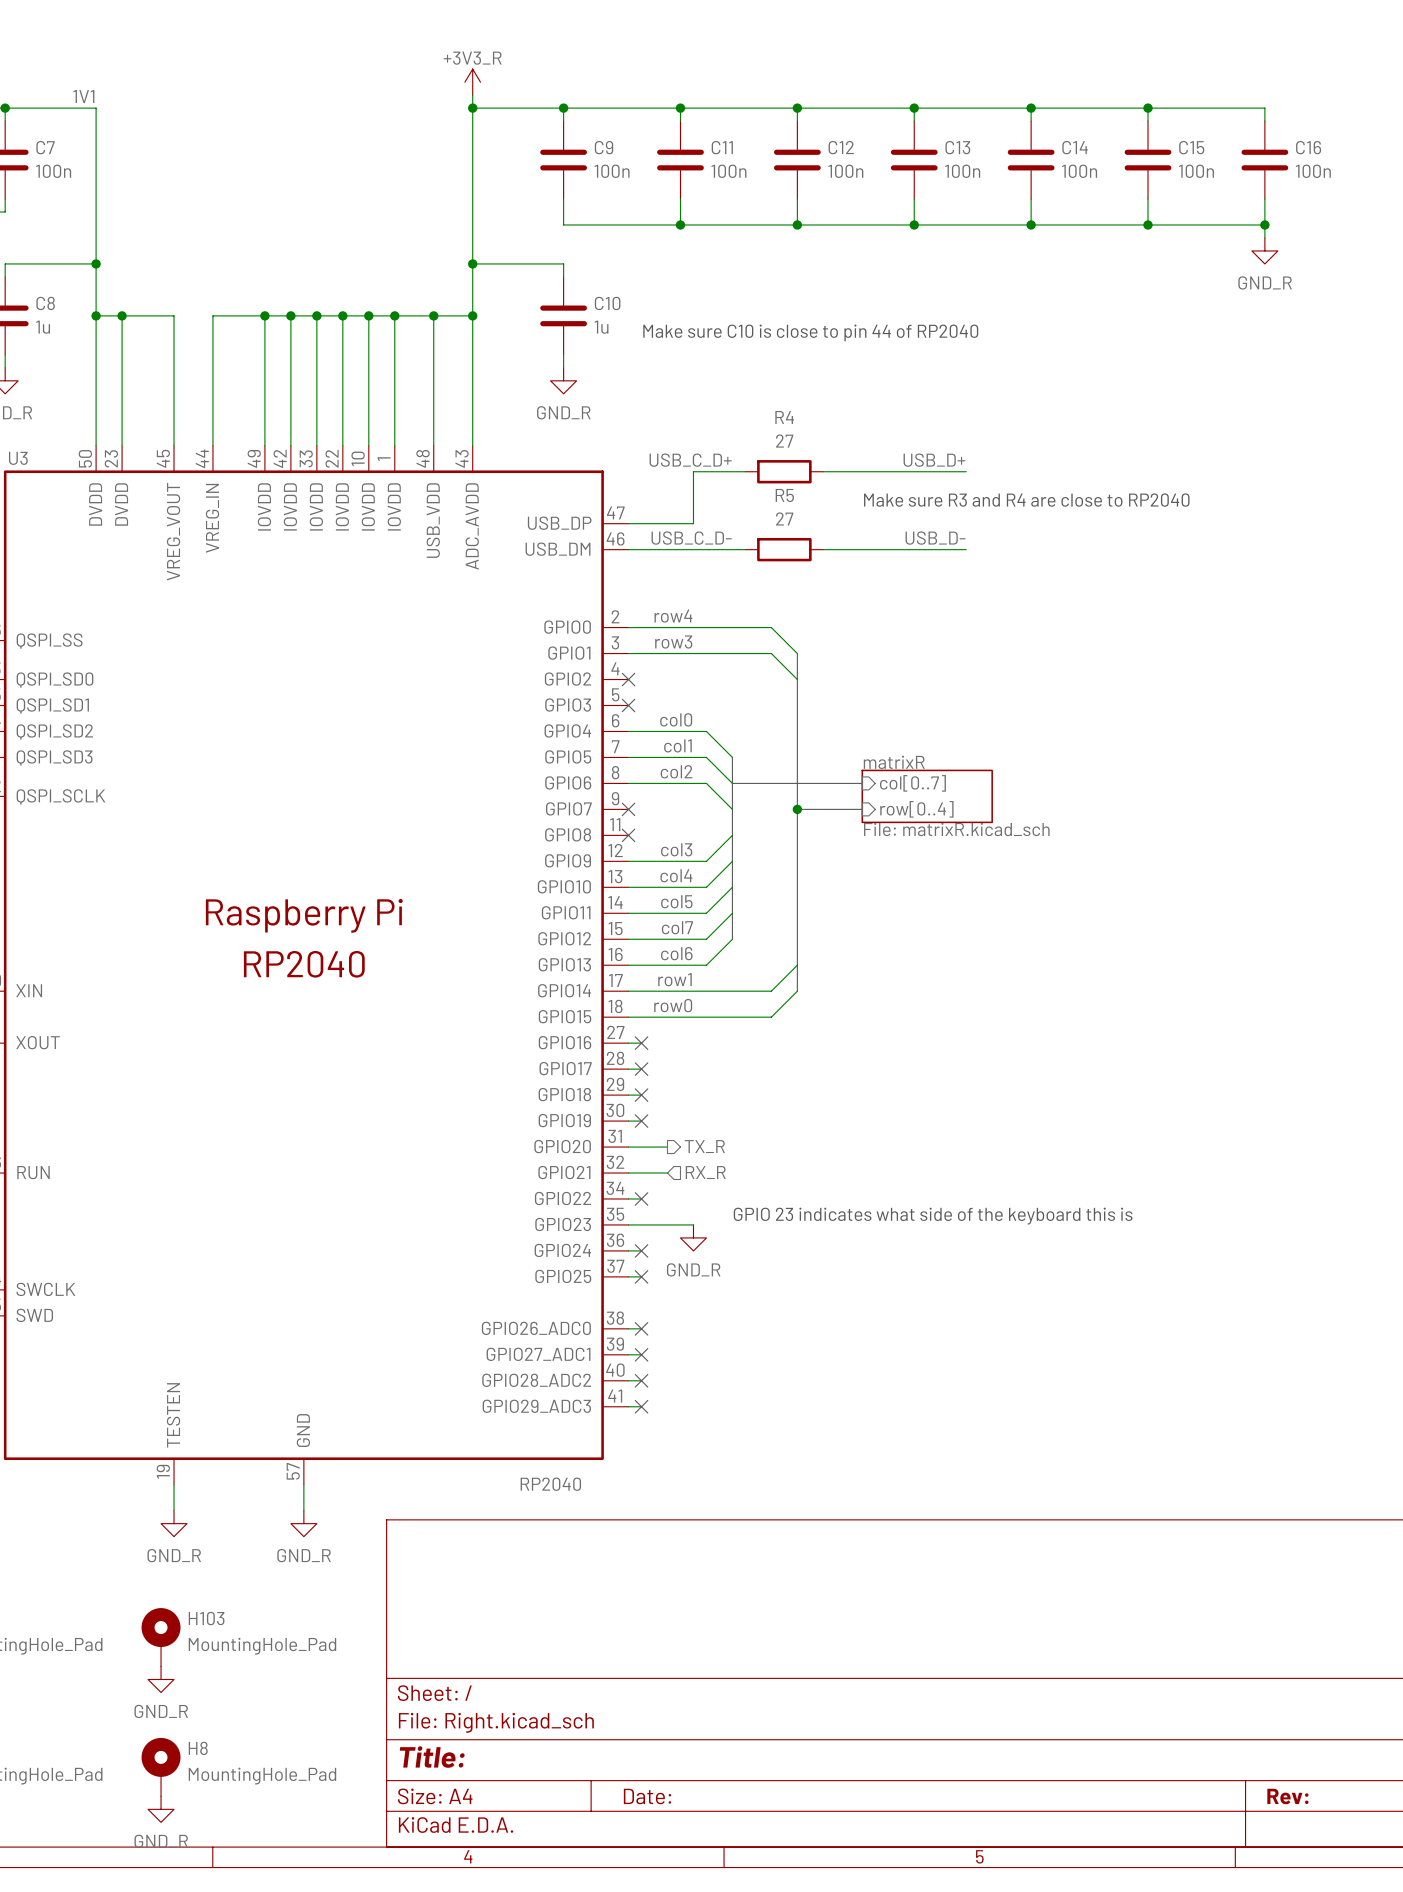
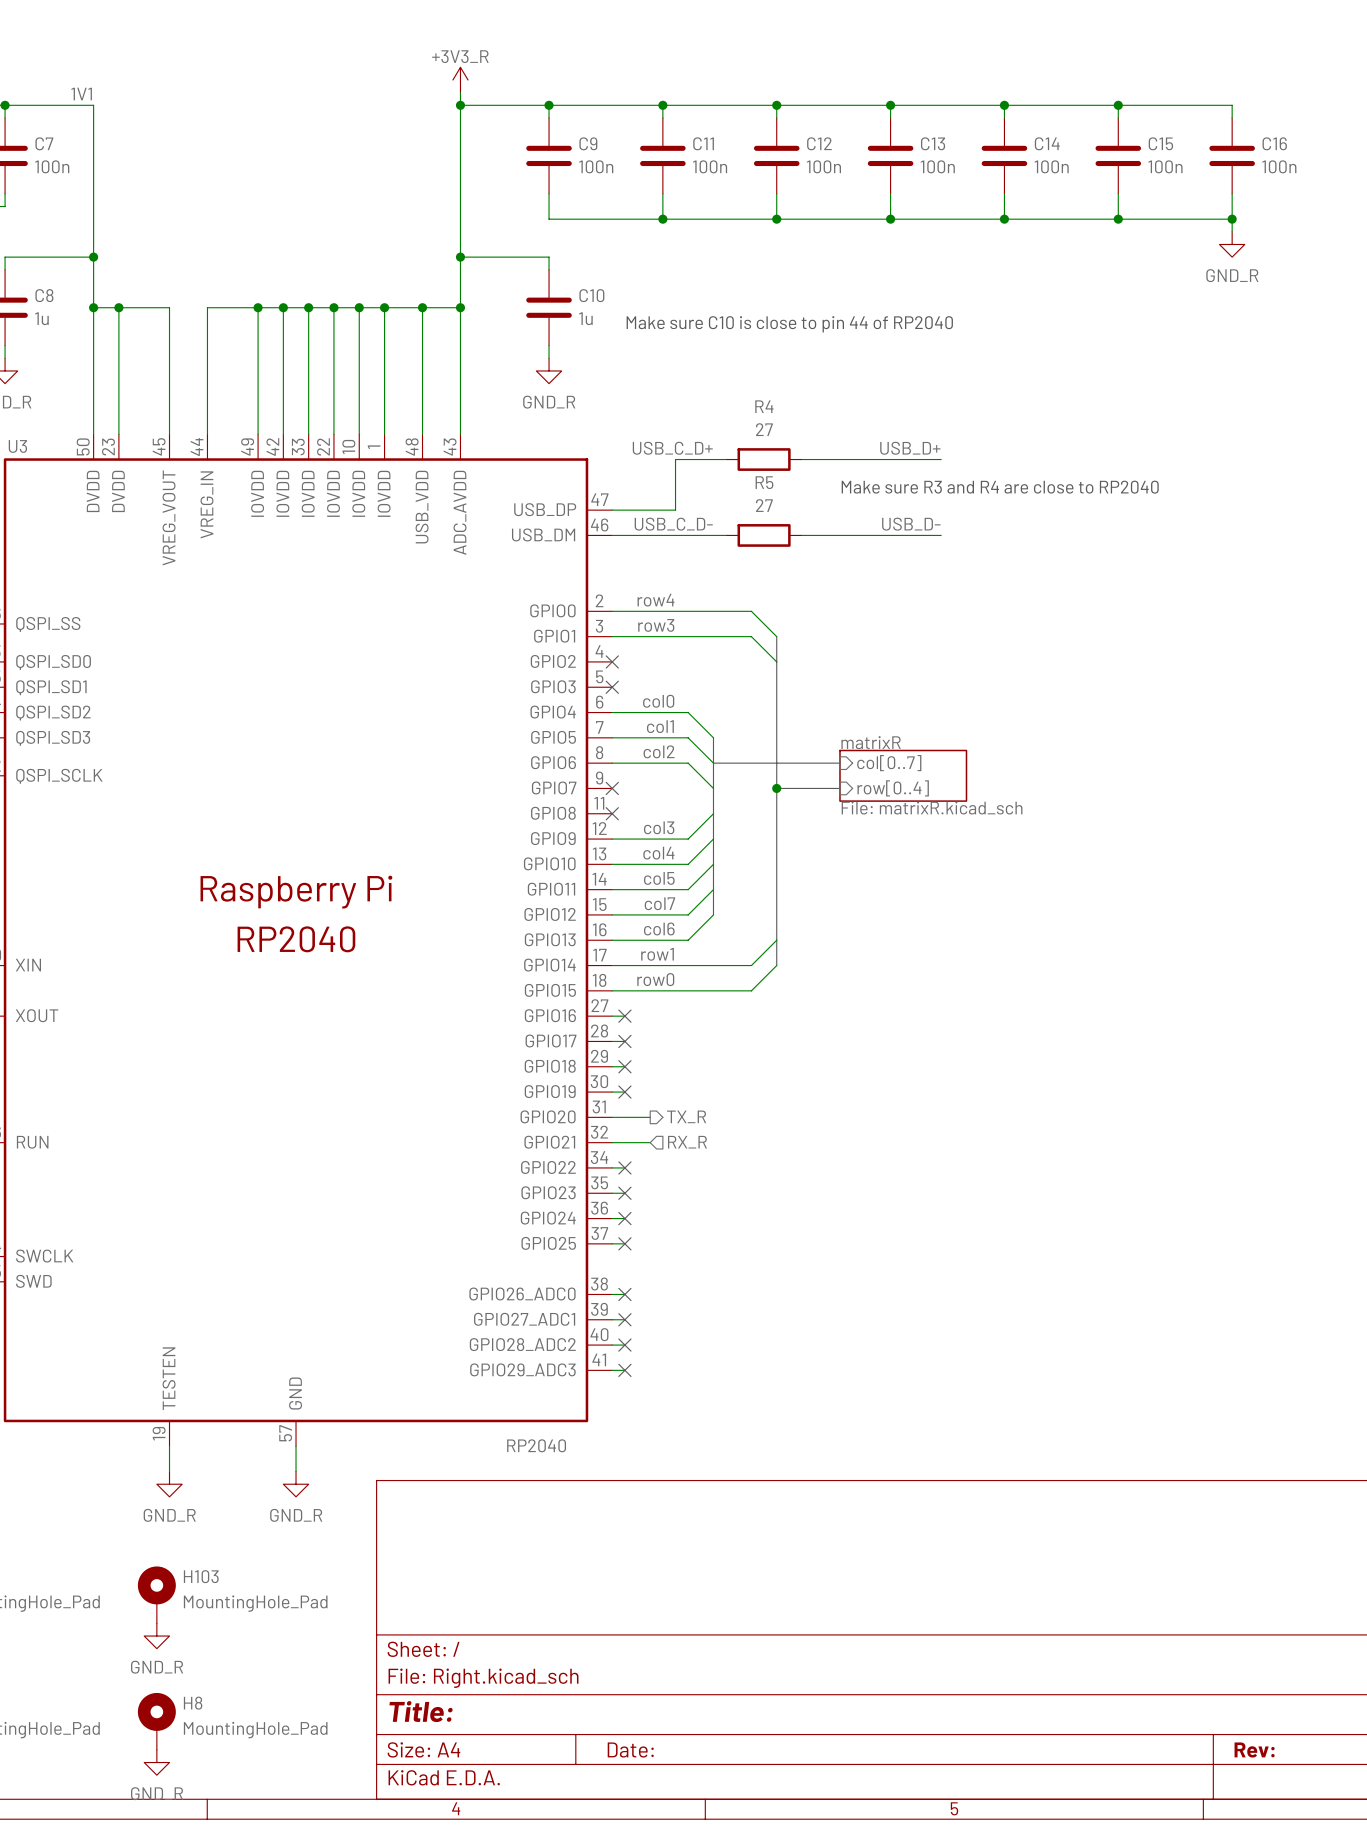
text: GPIO 23 indicates what side of the keyboard this is (933, 1216) -> none
wire: (641, 1224) (693, 1224) -> none
no-connect mark: none -> (624, 1193)
power symbol: GND_R (693, 1237) -> none

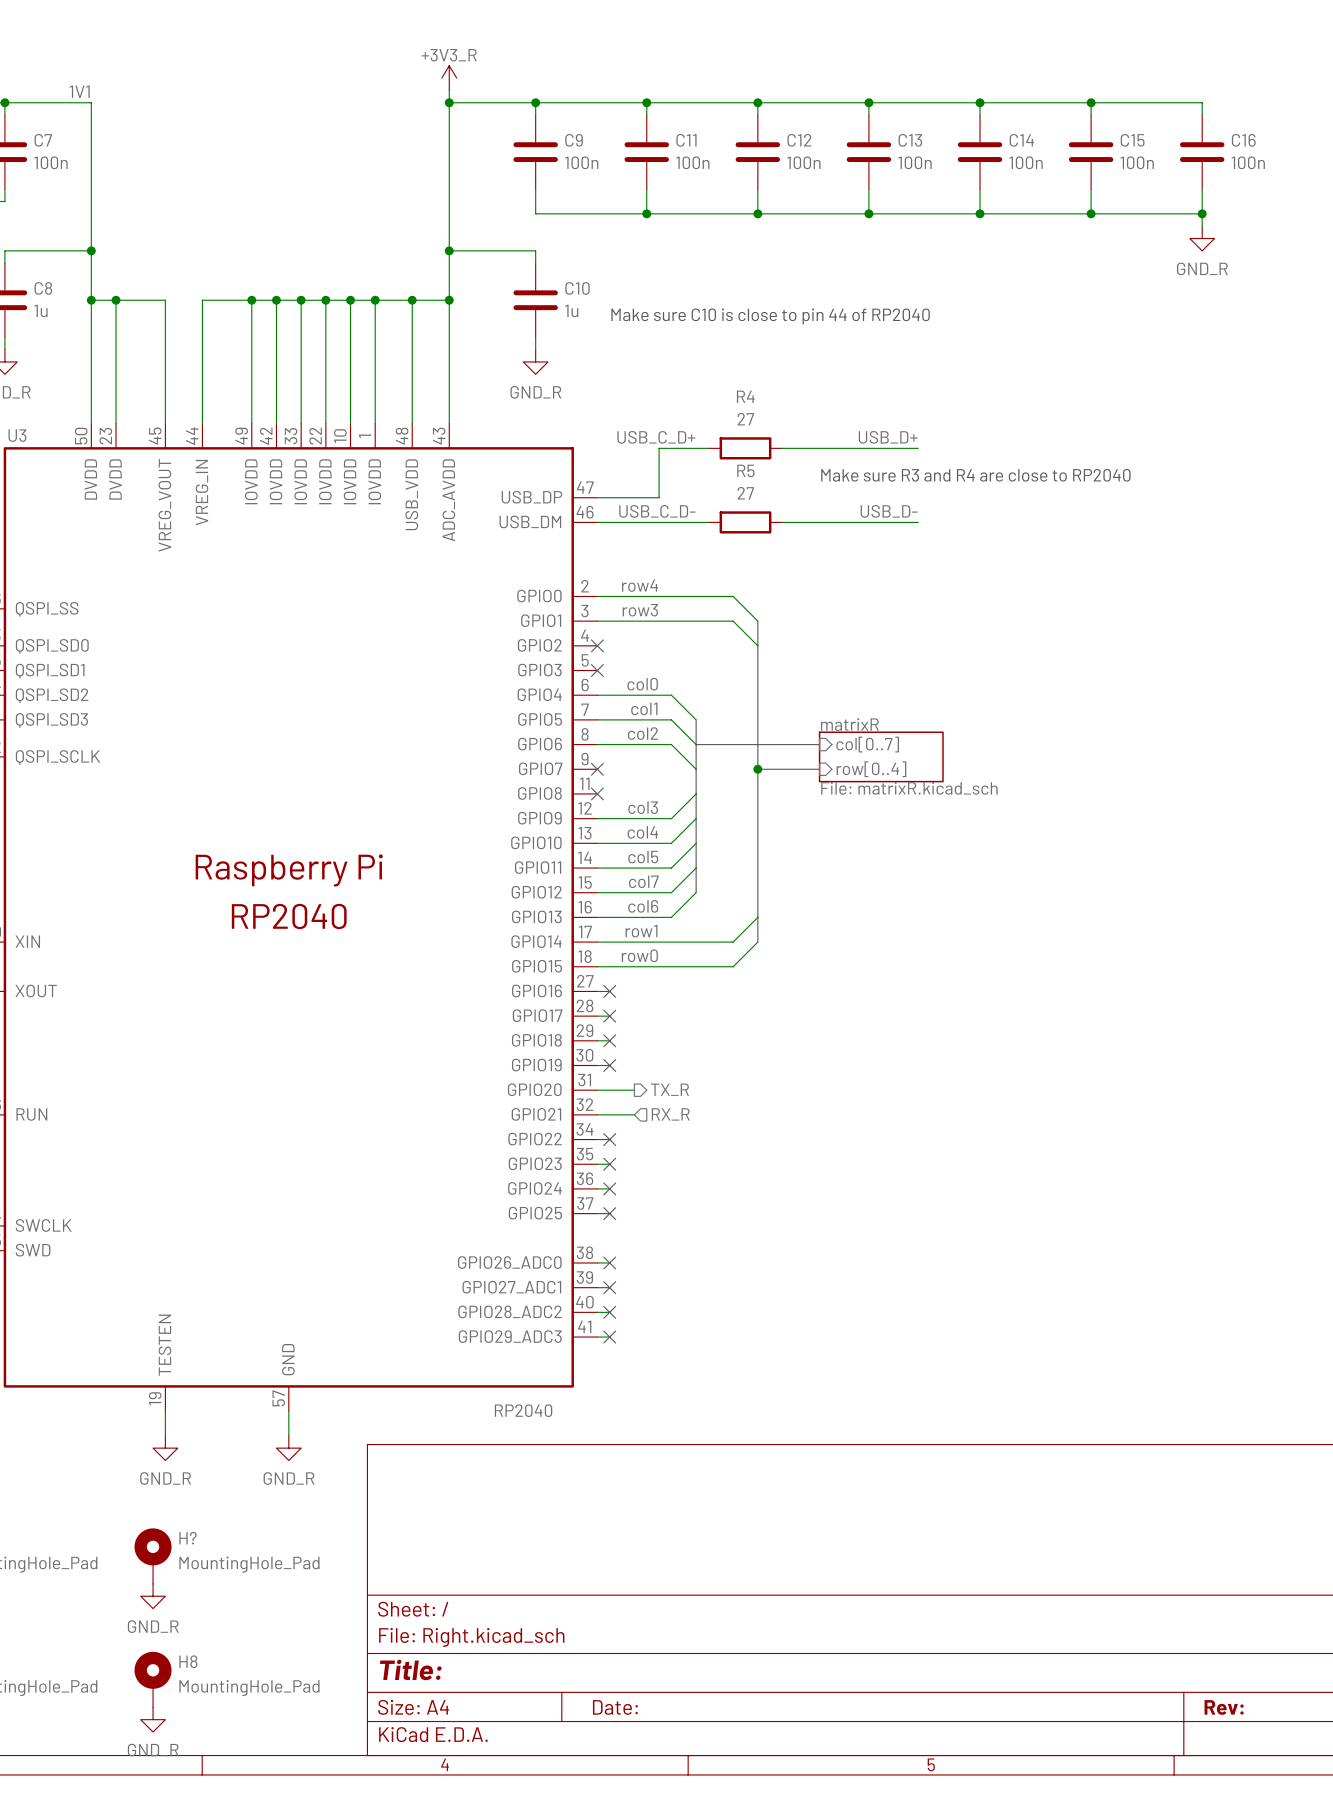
H103 name: H103 (201, 1576) -> H? (188, 1538)

